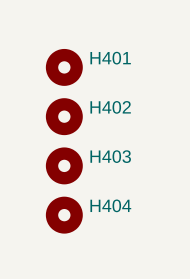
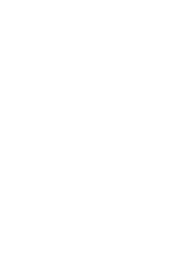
H401: (64, 67) -> none
H402: (64, 116) -> none
H403: (64, 165) -> none
H404: (64, 215) -> none

